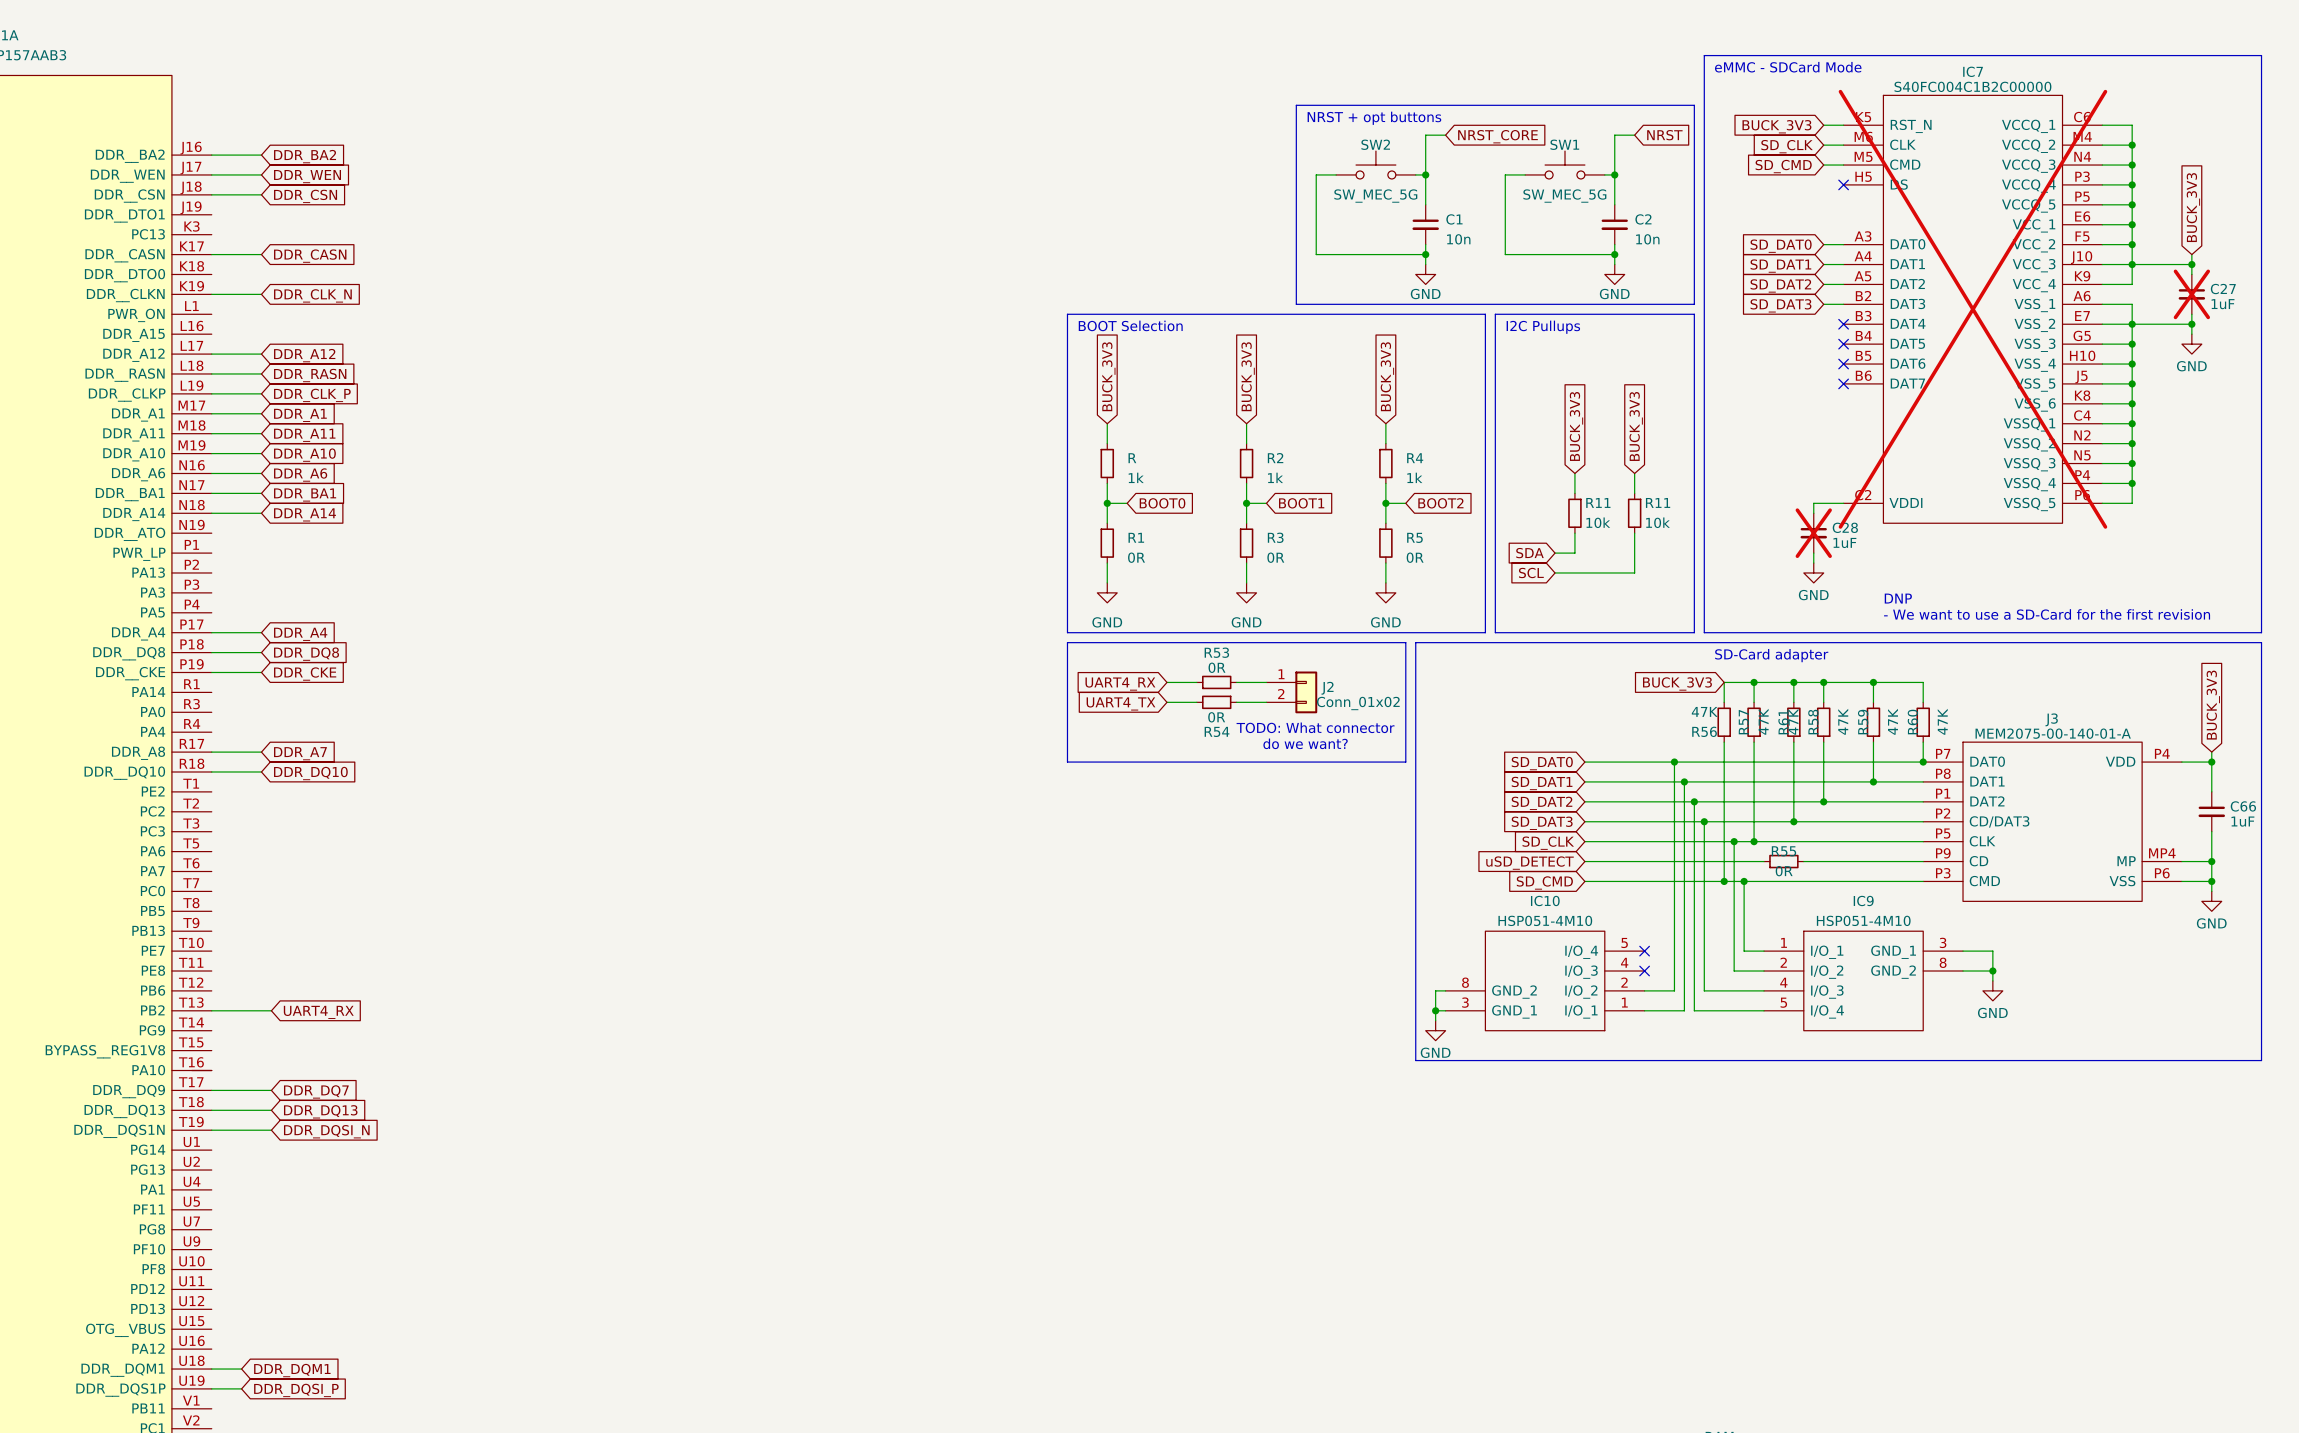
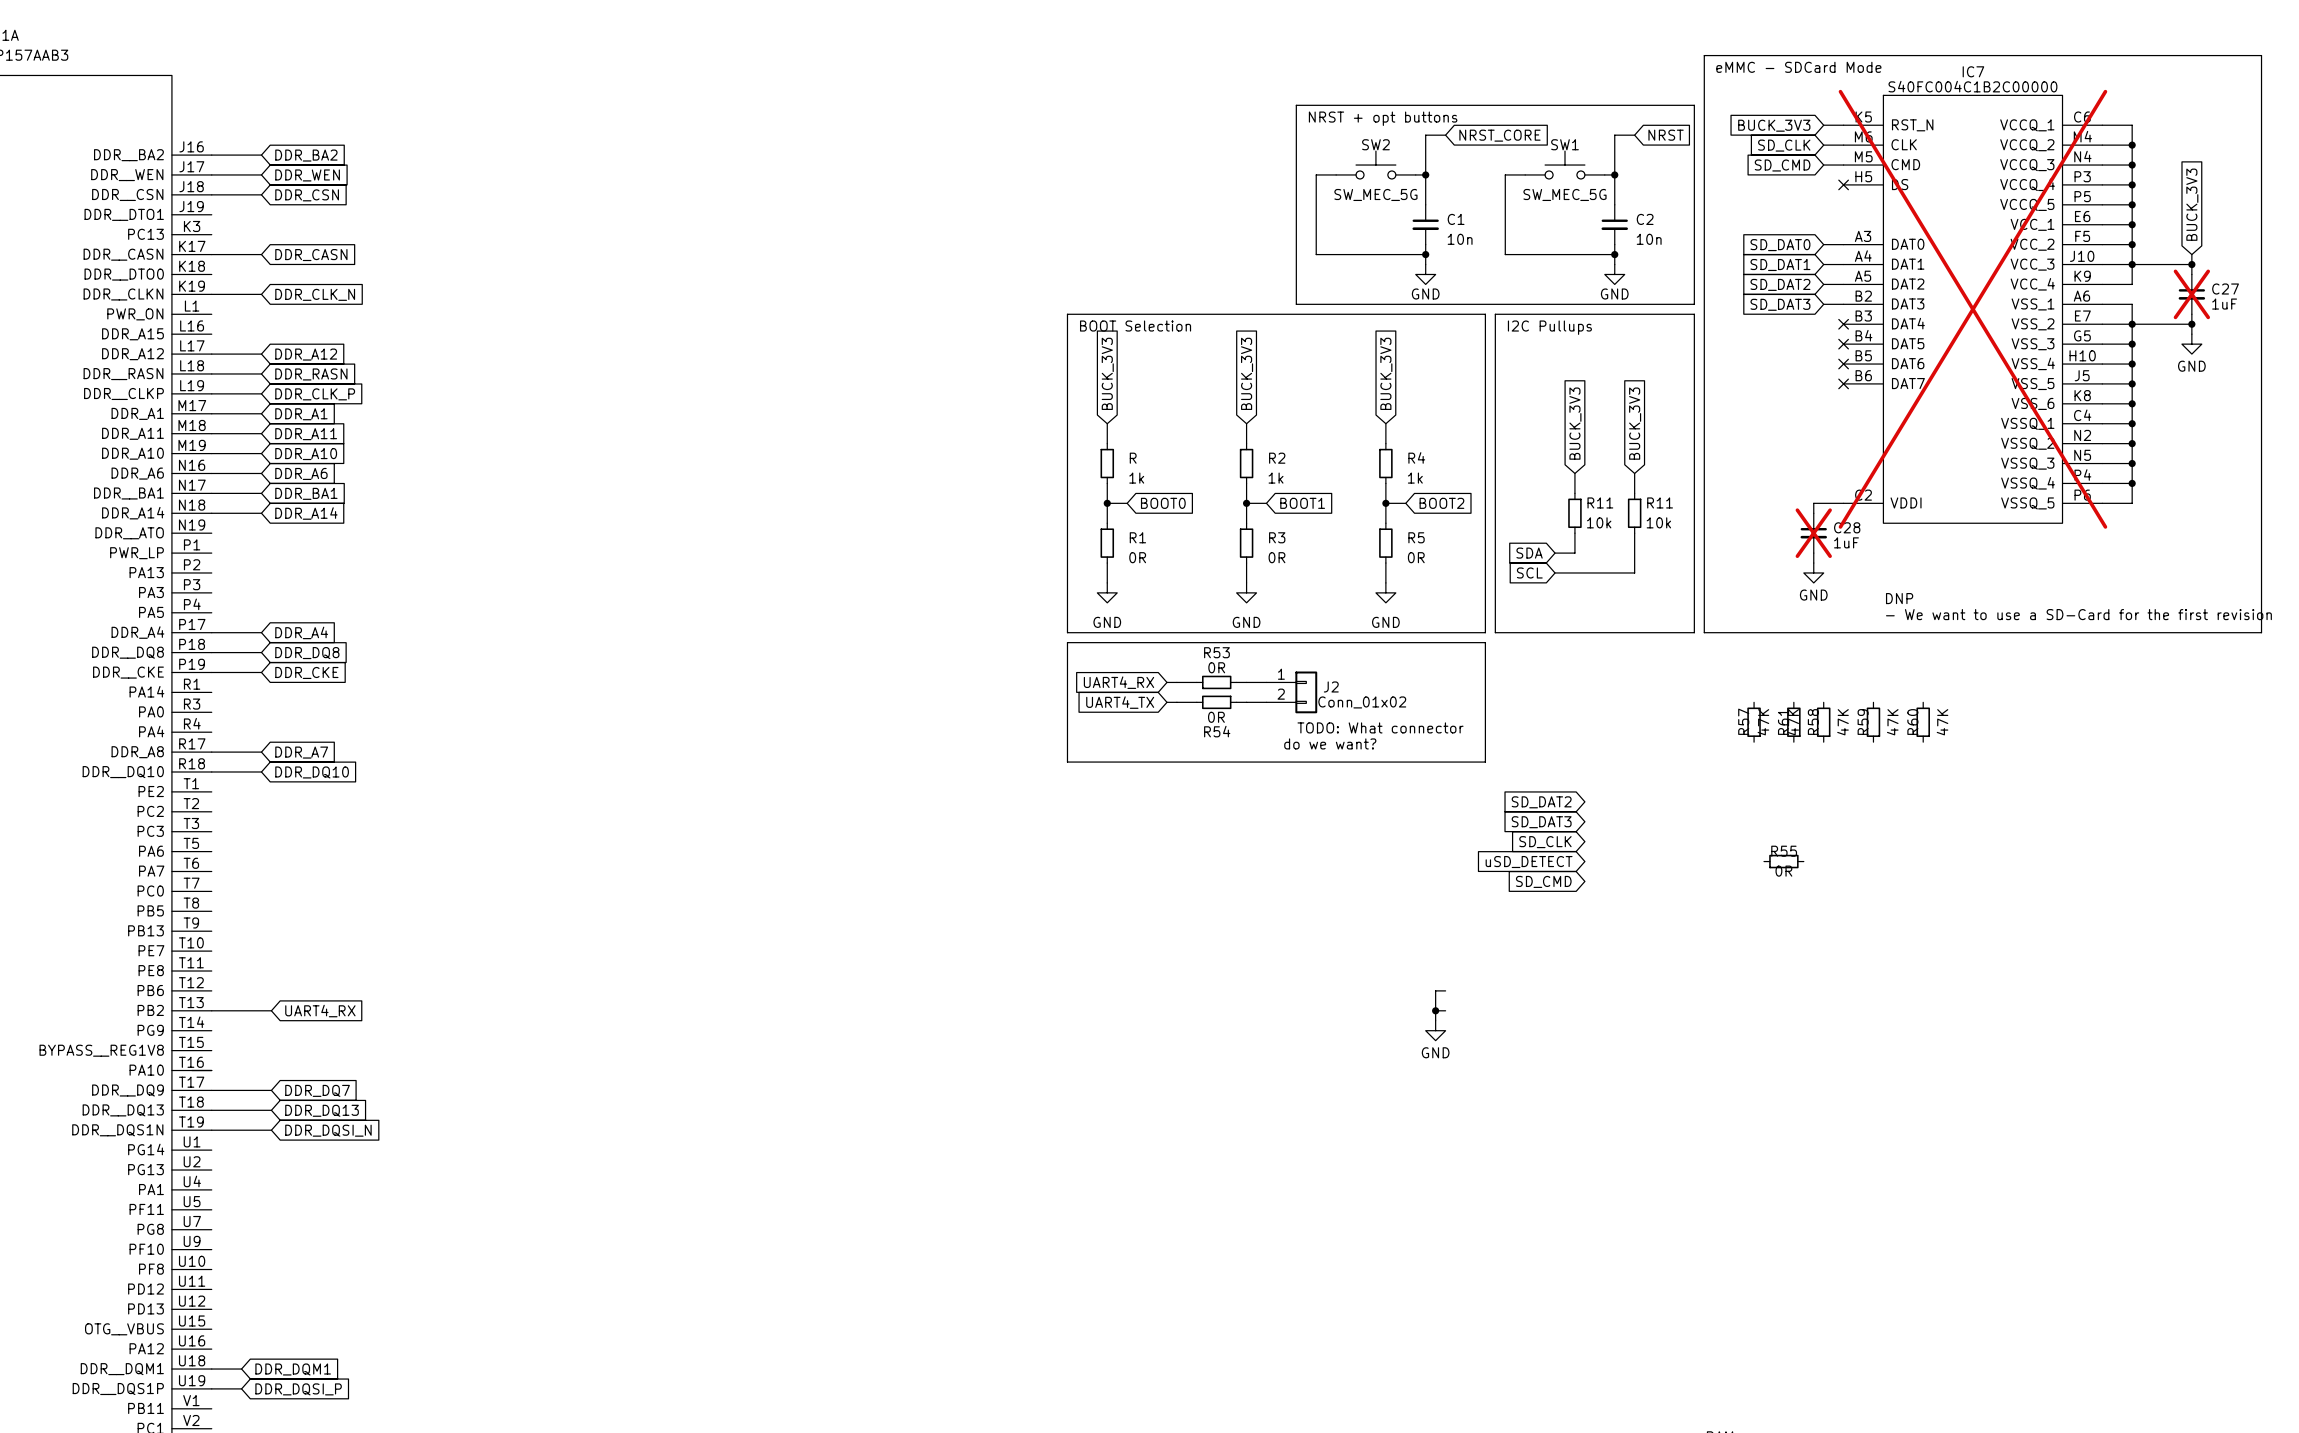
line: (1405, 642) (1405, 762) -> (1485, 642) (1485, 762) (1405, 762)
line: (1415, 642) (1415, 1060) (2261, 1060) (2261, 642) (1485, 642) -> (1415, 642) (1405, 642)
text: SD-Card adapter (1771, 655) -> none
wire: (1754, 682) (1754, 702) -> none
junction: (1754, 682) -> none
wire: (1793, 682) (1793, 702) -> none
junction: (1793, 682) -> none
wire: (1823, 682) (1823, 702) -> none
junction: (1823, 682) -> none
wire: (1873, 682) (1873, 702) -> none
junction: (1873, 682) -> none
global label: BUCK_3V3 (1677, 683) -> none
wire: (1724, 702) (1724, 682) (1923, 682) (1923, 702) -> none
global label: BUCK_3V3 (2213, 705) -> none
R56: 47K (1724, 722) -> none
text position: TODO: What connector (1315, 727) -> TODO: What connector (1380, 727)
wire: (1724, 742) (1724, 881) -> none
wire: (1754, 742) (1754, 841) -> none
wire: (1793, 742) (1793, 821) -> none
wire: (1823, 742) (1823, 801) -> none
wire: (1873, 742) (1873, 781) -> none
wire: (1923, 742) (1923, 762) (1584, 762) -> none
wire: (2211, 752) (2211, 791) -> none
wire: (1674, 762) (1674, 990) (1644, 990) -> none
junction: (1674, 762) -> none
junction: (1923, 762) -> none
wire: (2181, 762) (2211, 762) -> none
junction: (2211, 762) -> none
global label: SD_DAT0 (1542, 763) -> none
wire: (1584, 781) (1923, 781) -> none
wire: (1684, 781) (1684, 1010) (1644, 1010) -> none
junction: (1684, 781) -> none
junction: (1873, 781) -> none
global label: SD_DAT1 (1542, 783) -> none
wire: (1584, 801) (1923, 801) -> none
wire: (1694, 801) (1694, 1010) (1764, 1010) -> none
junction: (1694, 801) -> none
junction: (1823, 801) -> none
C66: 1uF (2211, 811) -> none
wire: (1584, 821) (1923, 821) -> none
wire: (1704, 821) (1704, 990) (1764, 990) -> none
junction: (1704, 821) -> none
junction: (1793, 821) -> none
J3: MEM2075-00-140-01-A (2052, 821) -> none
wire: (2211, 831) (2211, 891) -> none
wire: (1584, 841) (1923, 841) -> none
wire: (1734, 841) (1734, 971) (1764, 971) -> none
junction: (1734, 841) -> none
junction: (1754, 841) -> none
wire: (1584, 861) (1764, 861) -> none
wire: (1803, 861) (1923, 861) -> none
wire: (2181, 861) (2211, 861) -> none
junction: (2211, 861) -> none
wire: (1584, 881) (1923, 881) -> none
junction: (1724, 881) -> none
wire: (1744, 881) (1744, 951) (1764, 951) -> none
junction: (1744, 881) -> none
wire: (2181, 881) (2211, 881) -> none
junction: (2211, 881) -> none
power symbol: GND (2211, 901) -> none
no-connect mark: (1644, 951) -> none
wire: (1963, 951) (1992, 951) (1992, 980) -> none
no-connect mark: (1644, 971) -> none
wire: (1963, 971) (1992, 971) -> none
junction: (1992, 971) -> none
IC10: HSP051-4M10 (1545, 980) -> none
IC9: HSP051-4M10 (1863, 980) -> none
power symbol: GND (1992, 990) -> none

